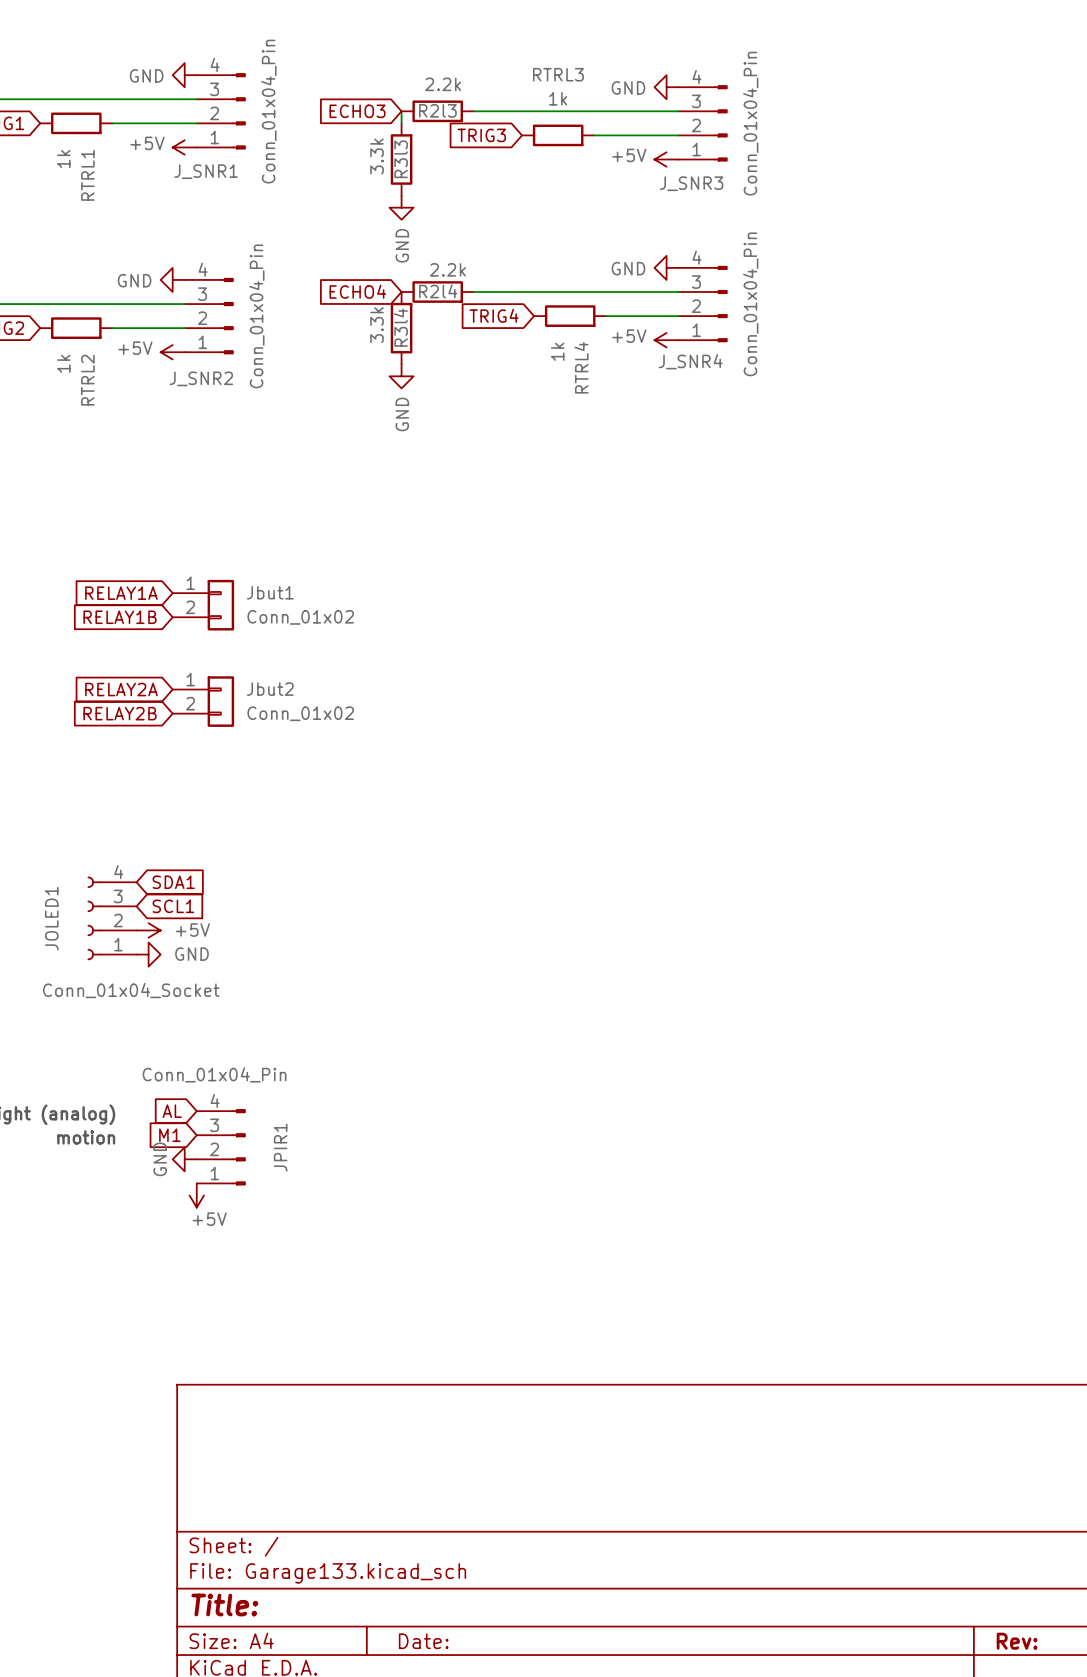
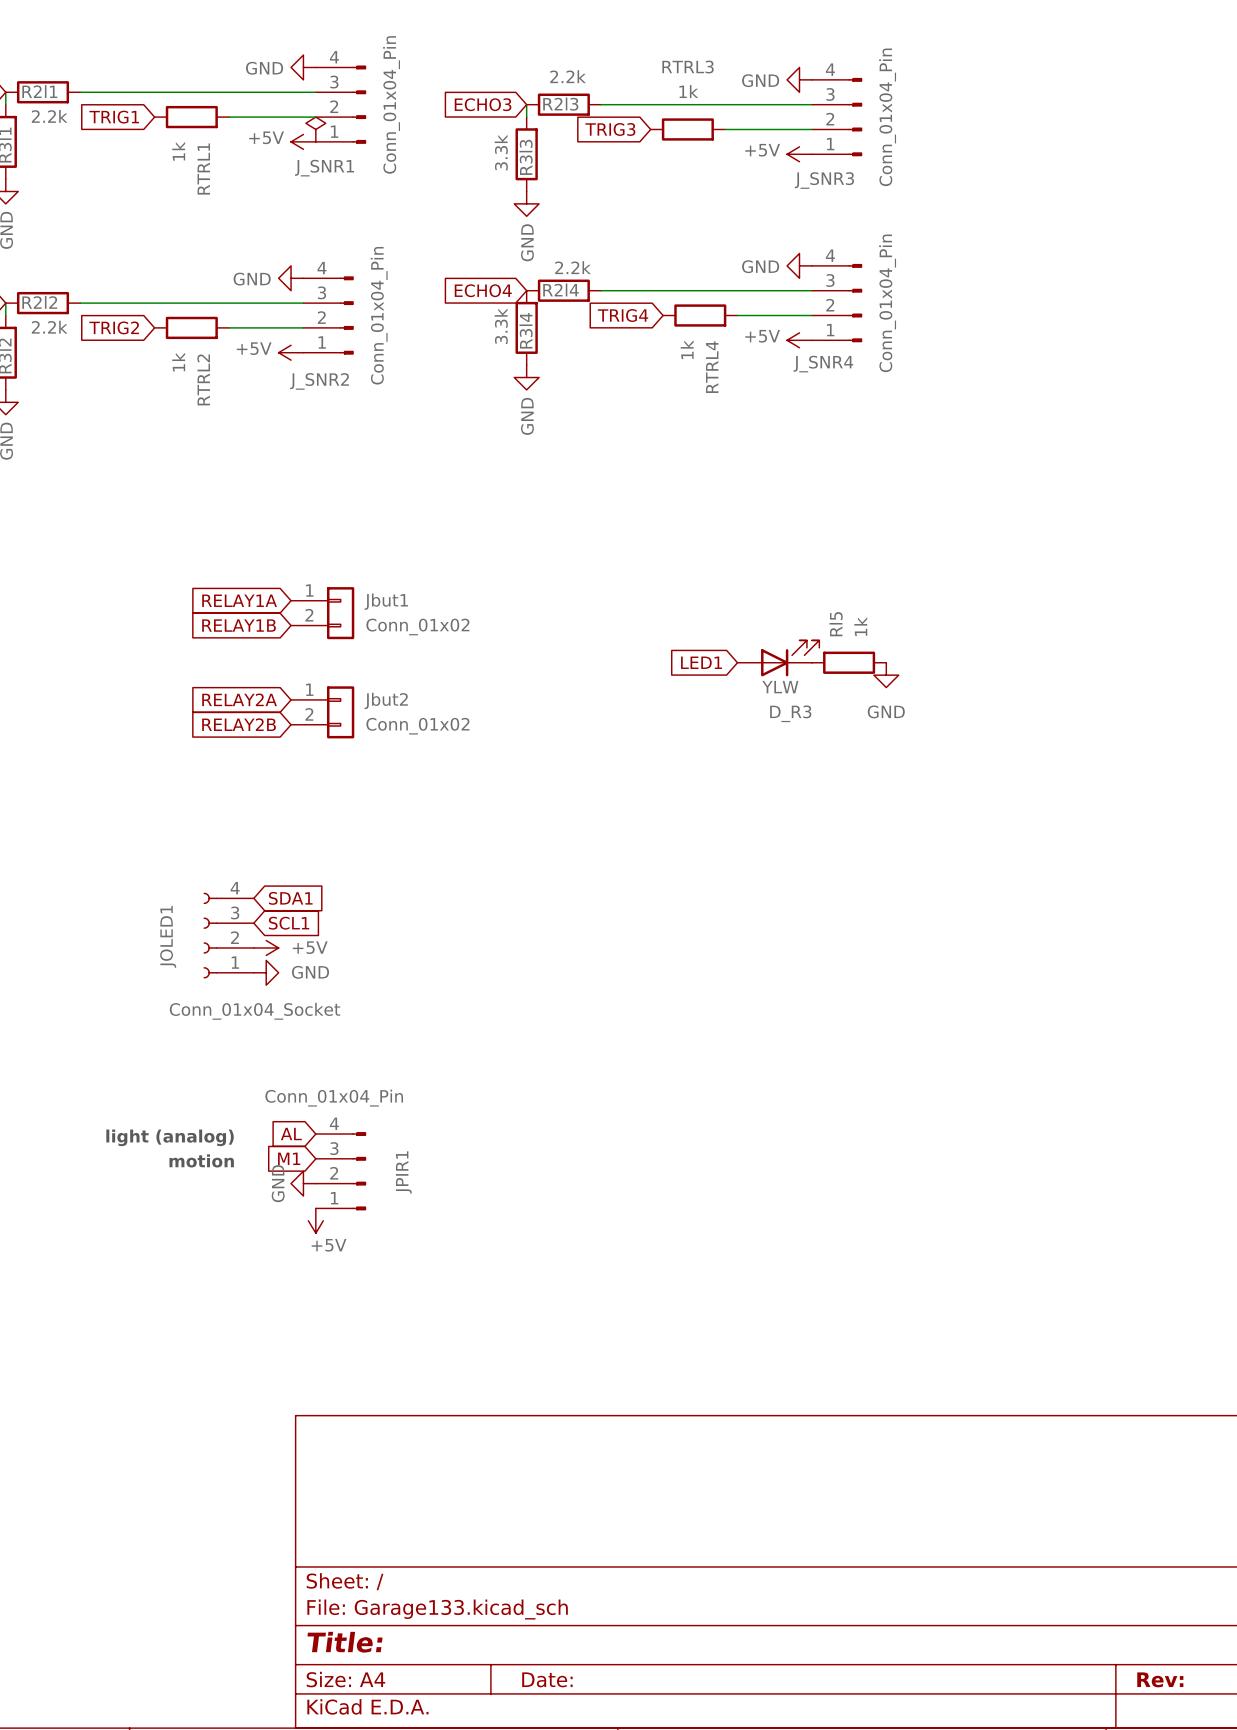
power symbol: none -> (315, 129)
D_R3: none -> YLW (778, 658)
global label: none -> LED1 (701, 662)
Rl5: none -> 1k (849, 662)
power symbol: none -> GND (886, 675)

